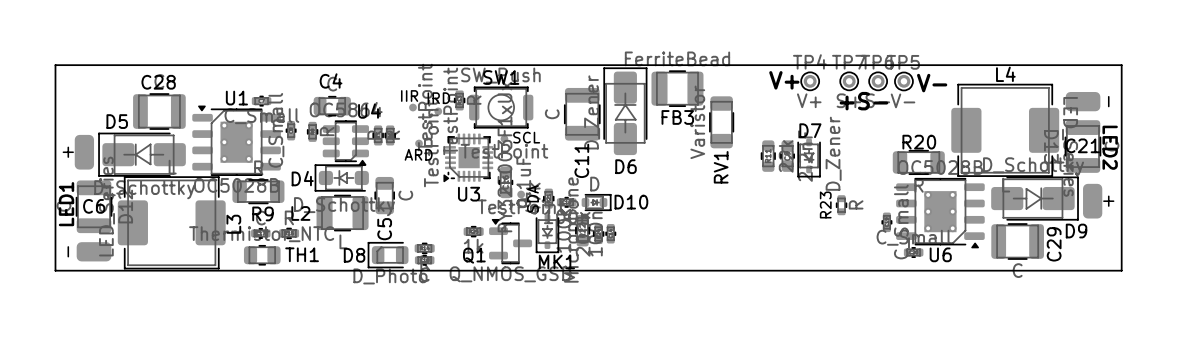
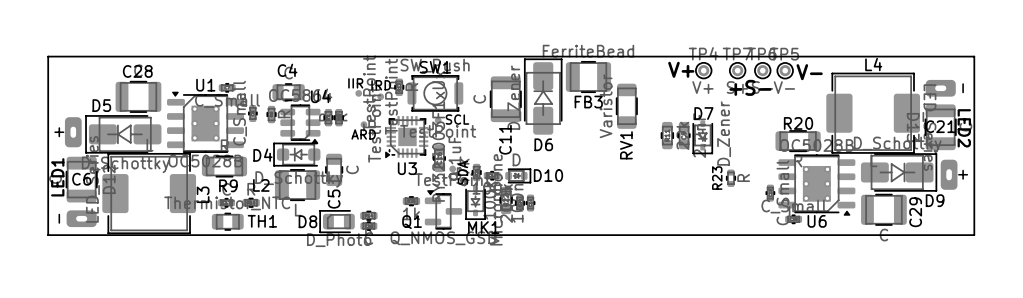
part footprint: [1065, 92, 1103, 219] -> [925, 79, 958, 190]
part footprint: [74, 134, 112, 262] -> [64, 117, 97, 228]

